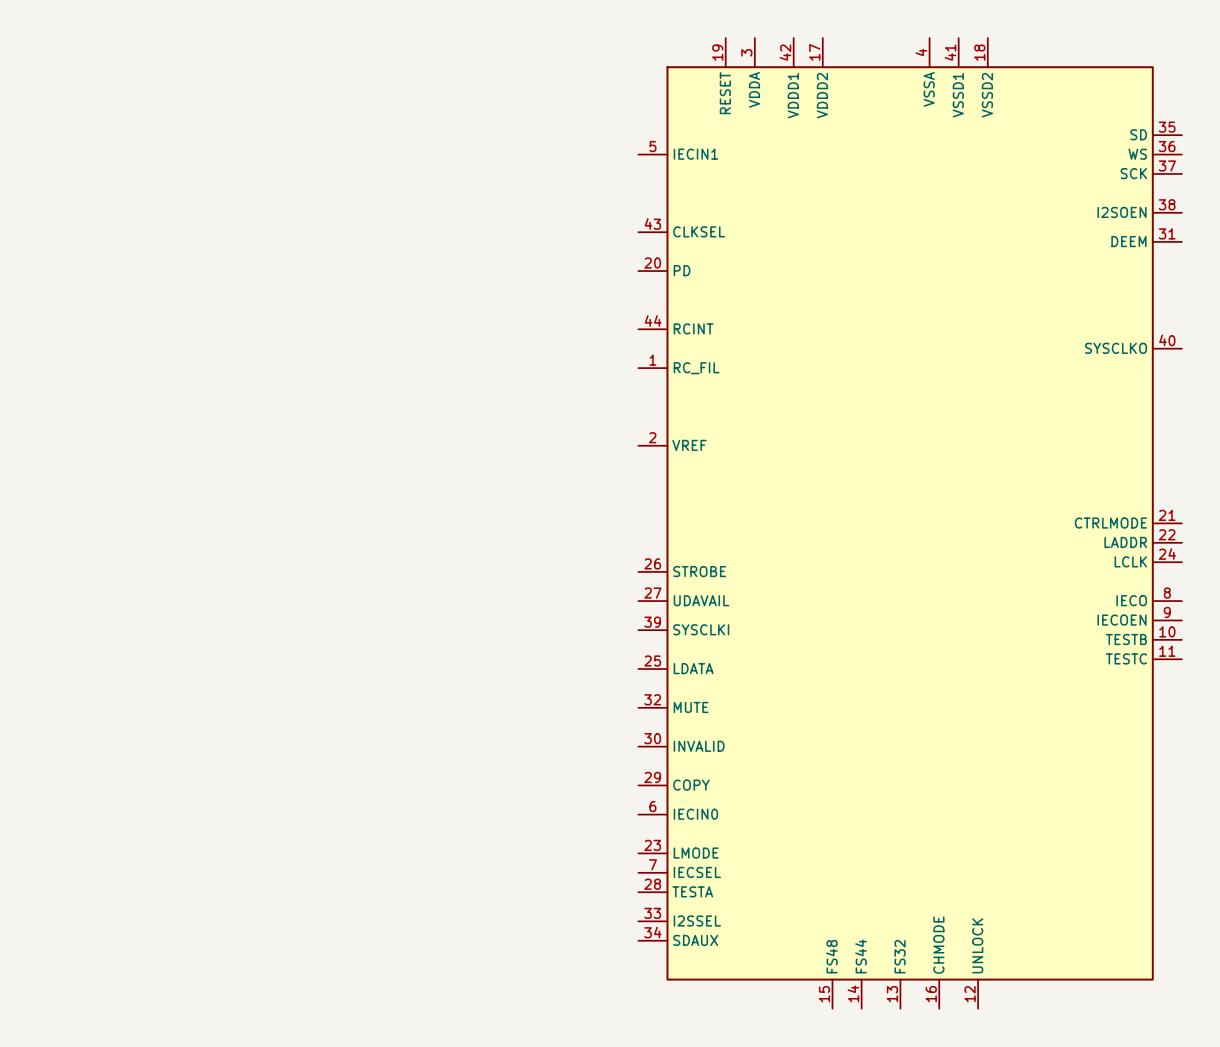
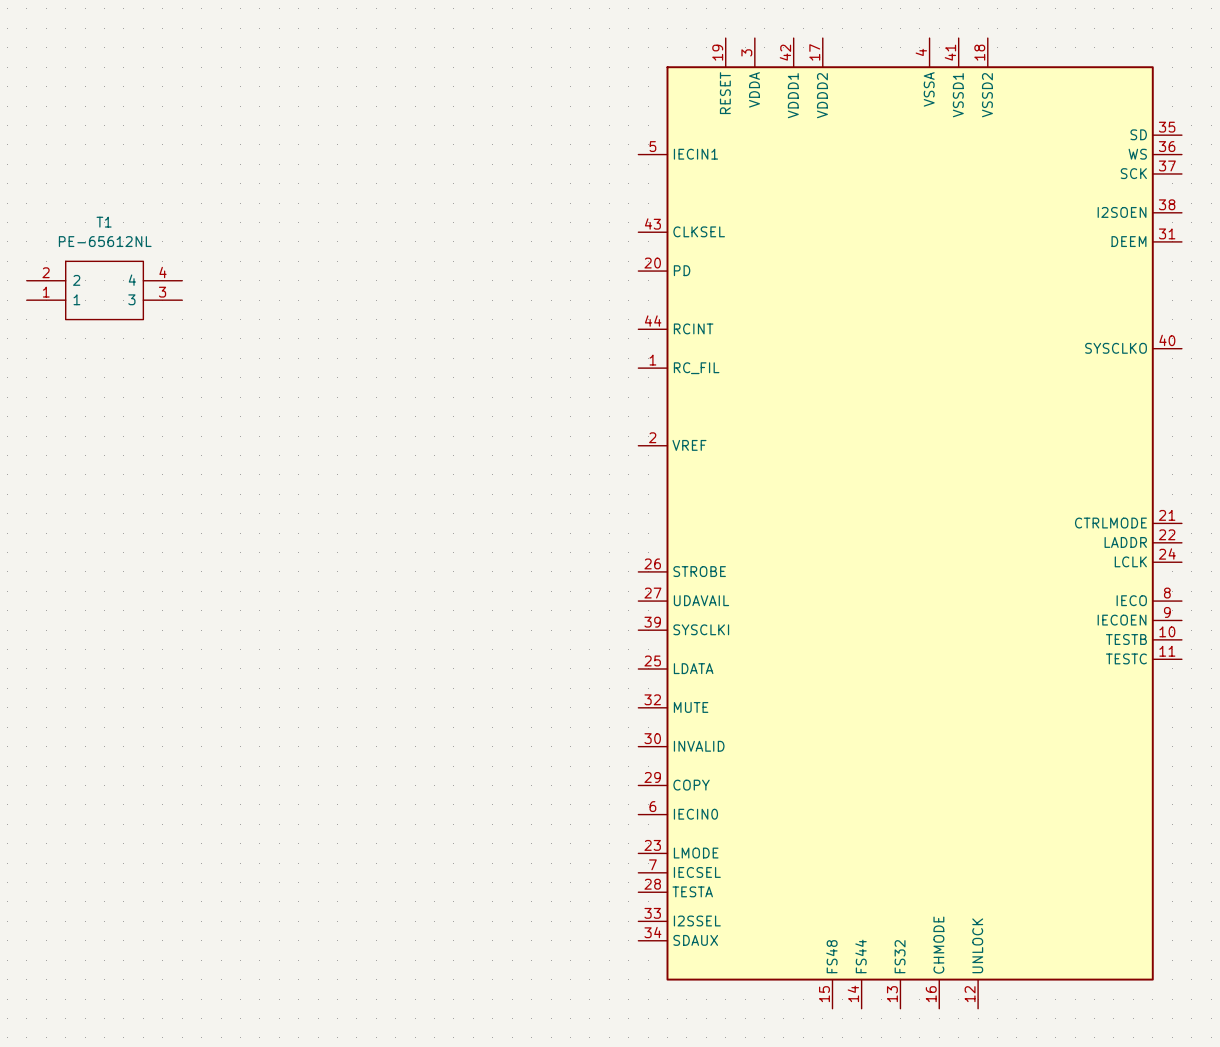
T1: none -> PE-65612NL (104, 290)

